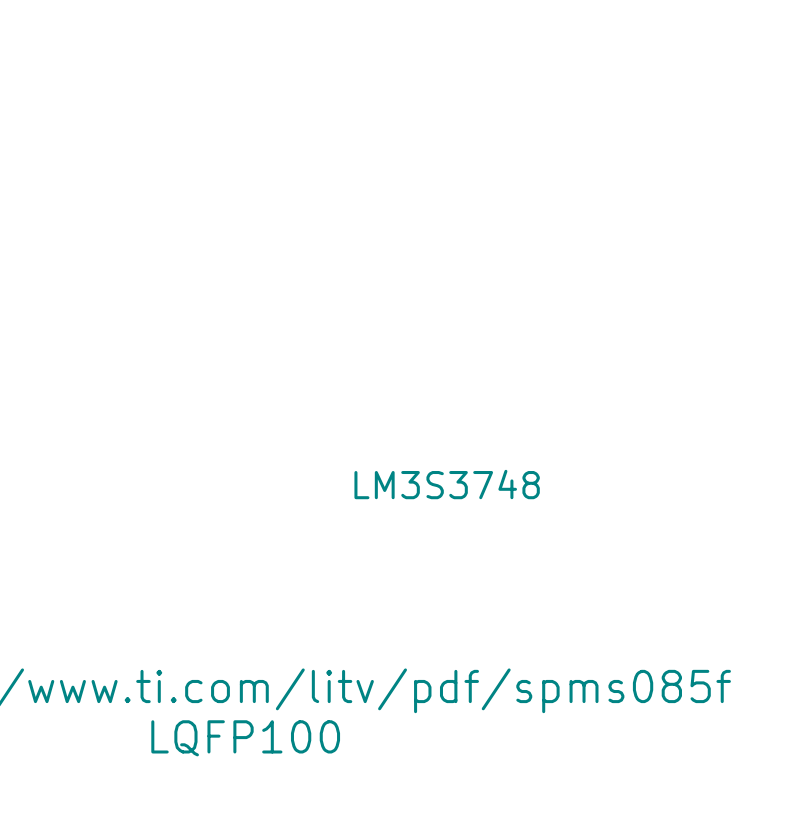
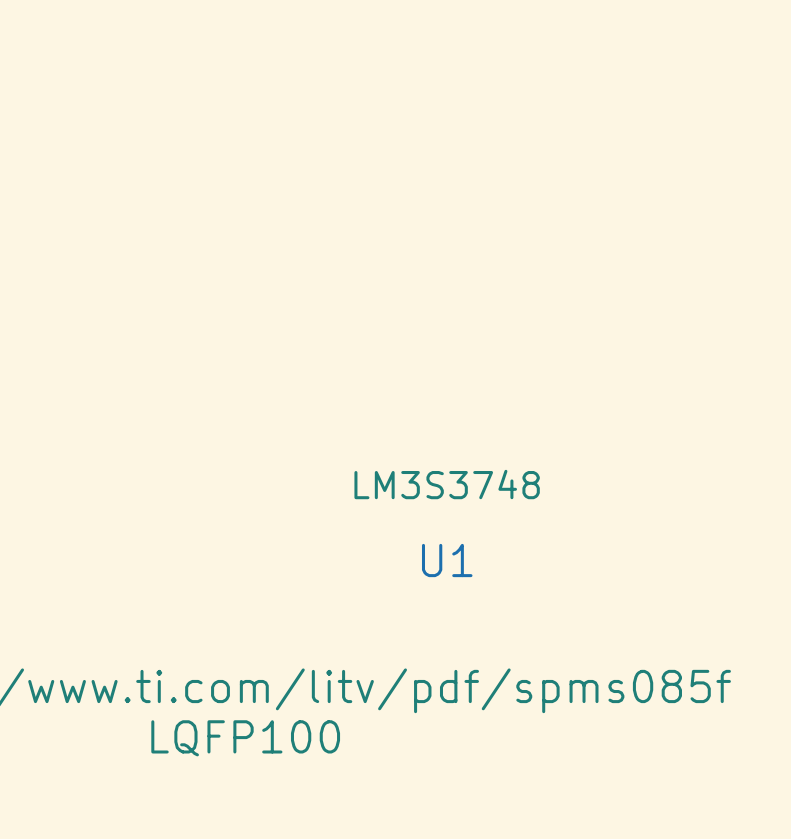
U1 name: none -> U1 (447, 560)

